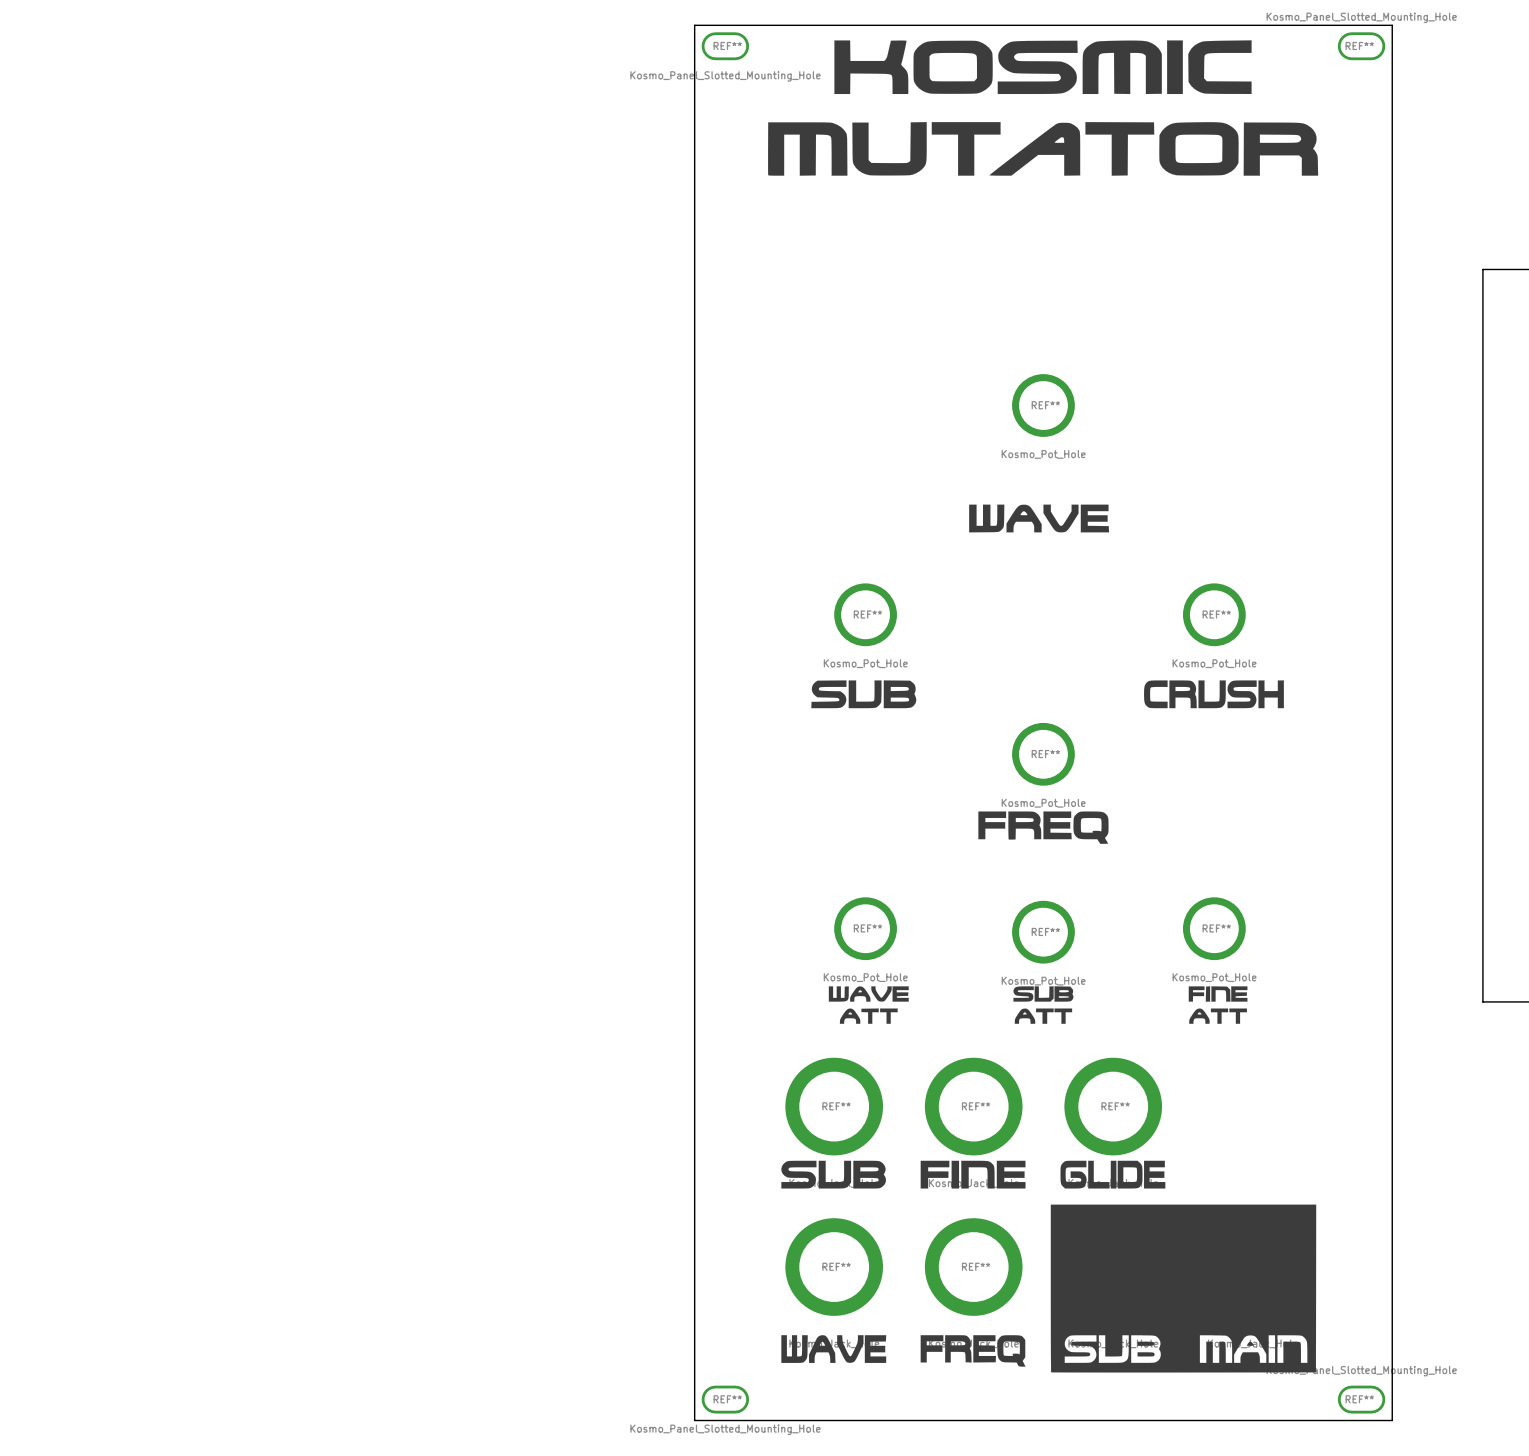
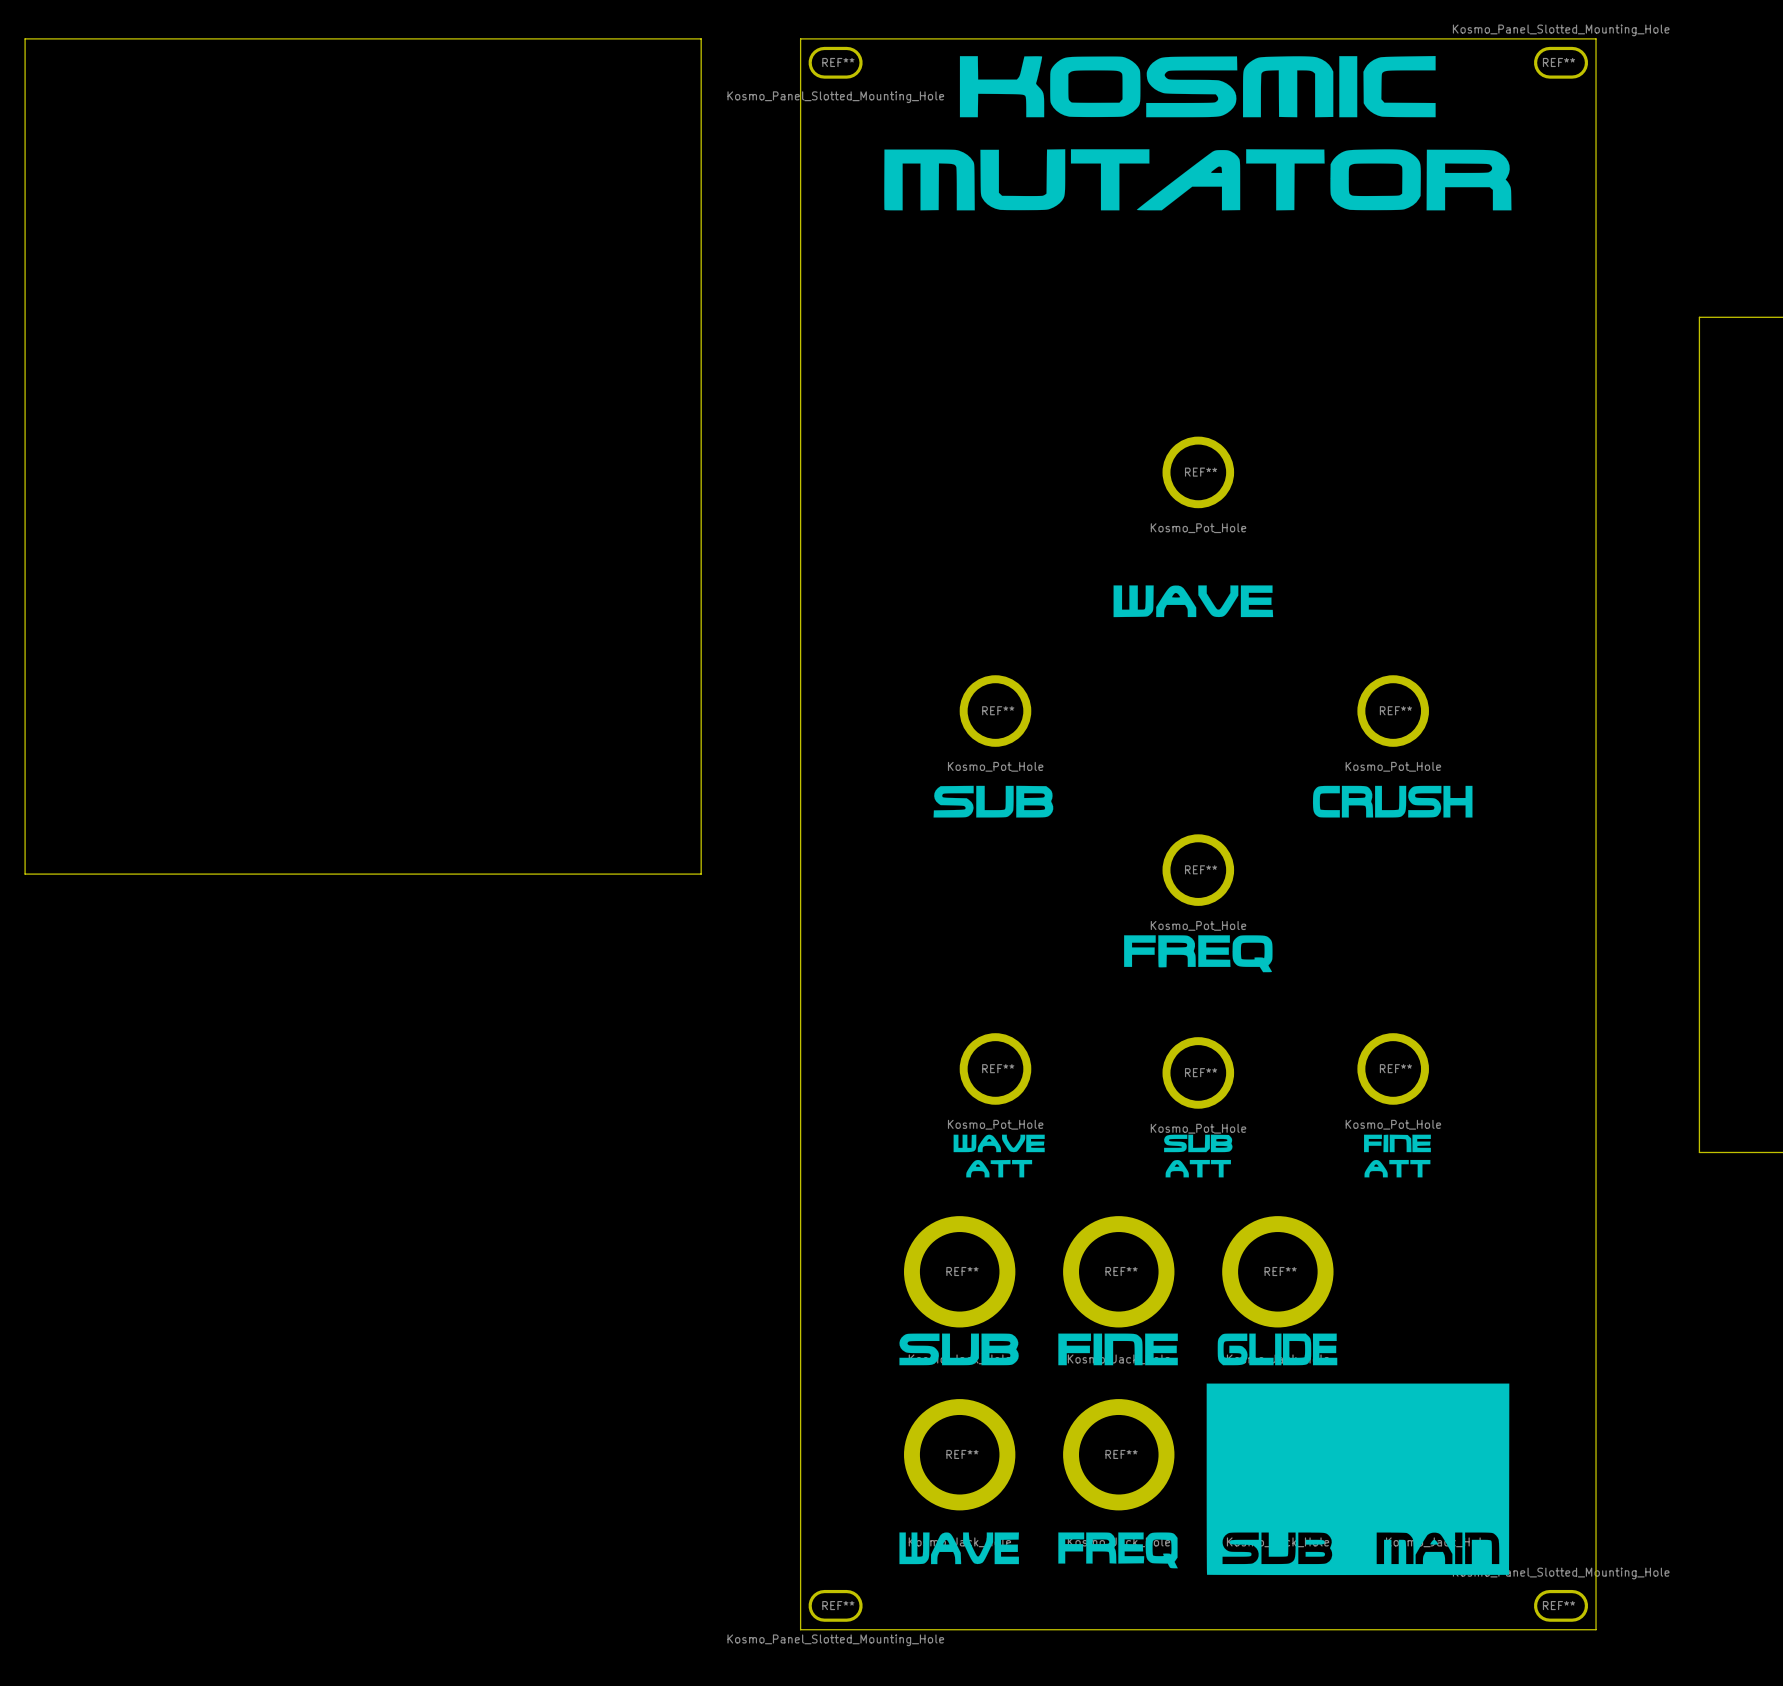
board edge: none -> (25, 38) (701, 38) (701, 874) (25, 874) (25, 38)

